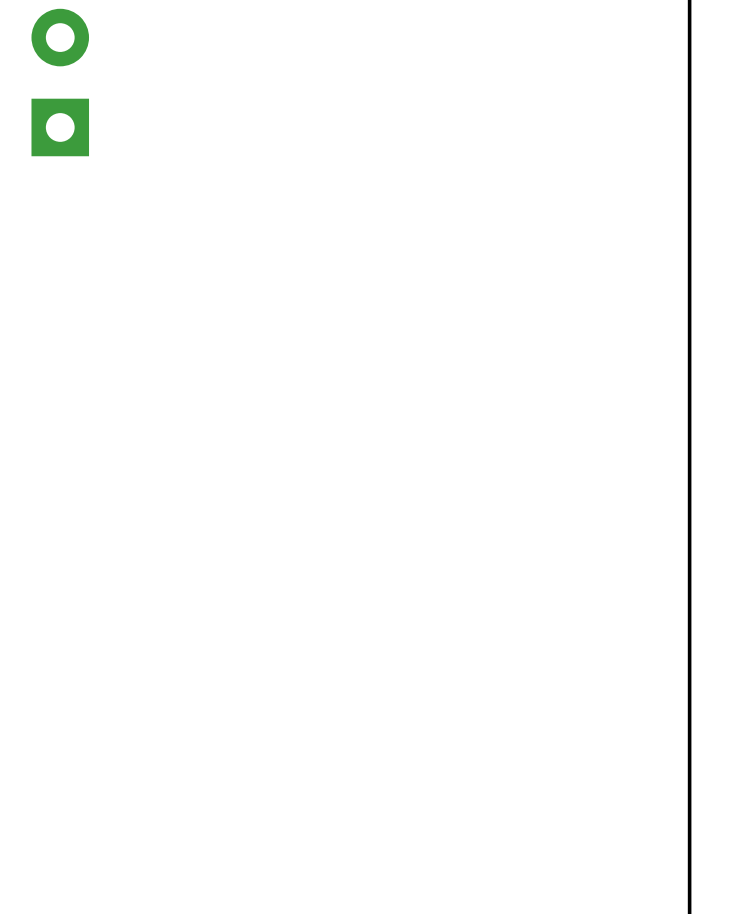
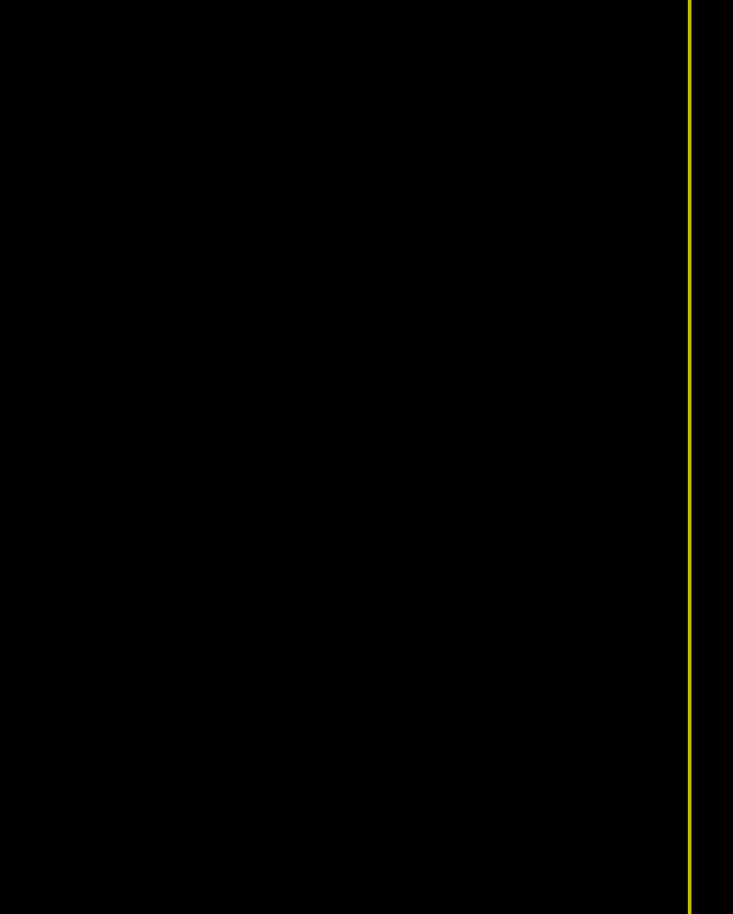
part: (60, 82) -> none

